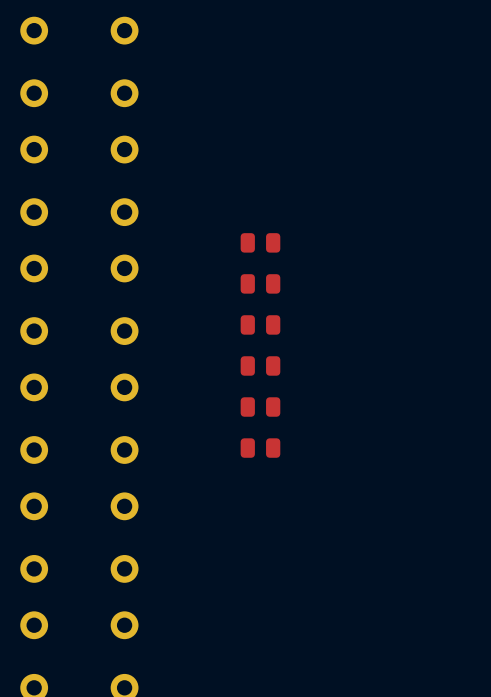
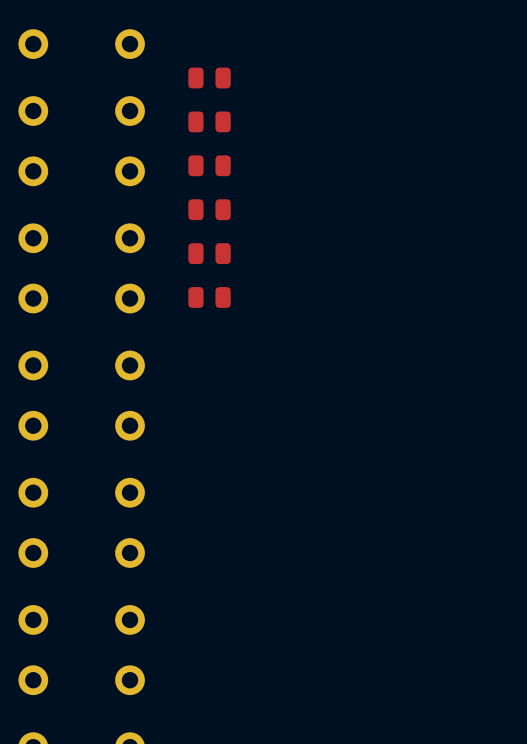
part: none -> (209, 78)
part: none -> (209, 121)
part: none -> (209, 165)
part: none -> (209, 209)
part: none -> (209, 253)
part: (260, 242) -> none
part: none -> (209, 297)
part: (260, 283) -> none
part: (260, 324) -> none
part: (260, 365) -> none
part: (260, 407) -> none
part: (260, 448) -> none

